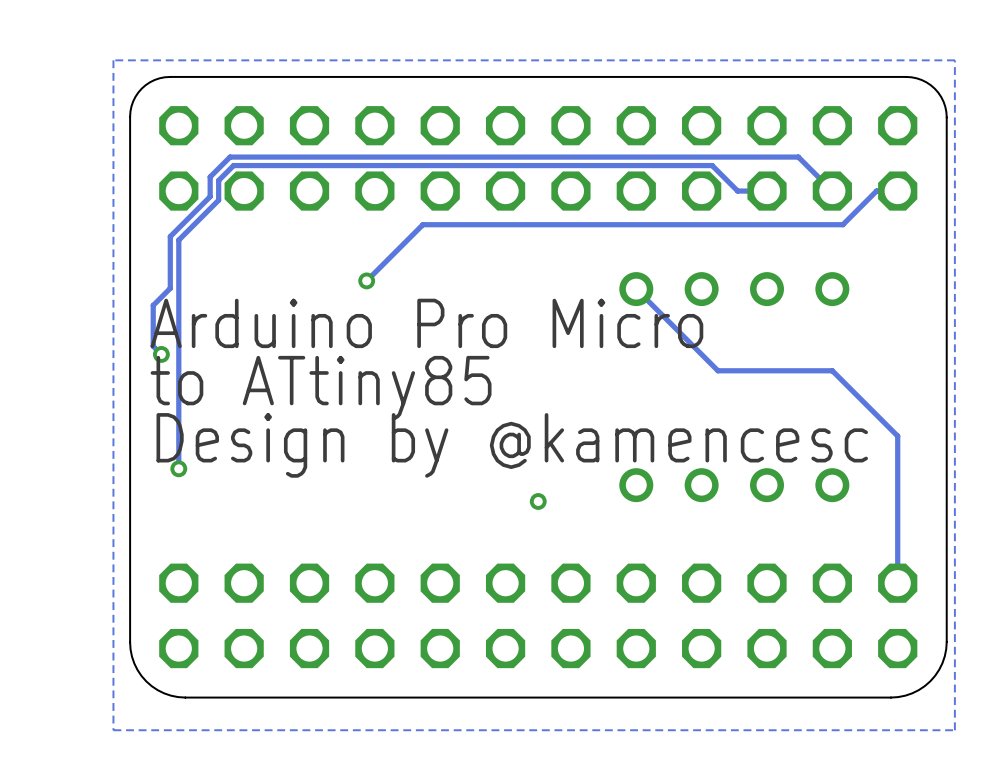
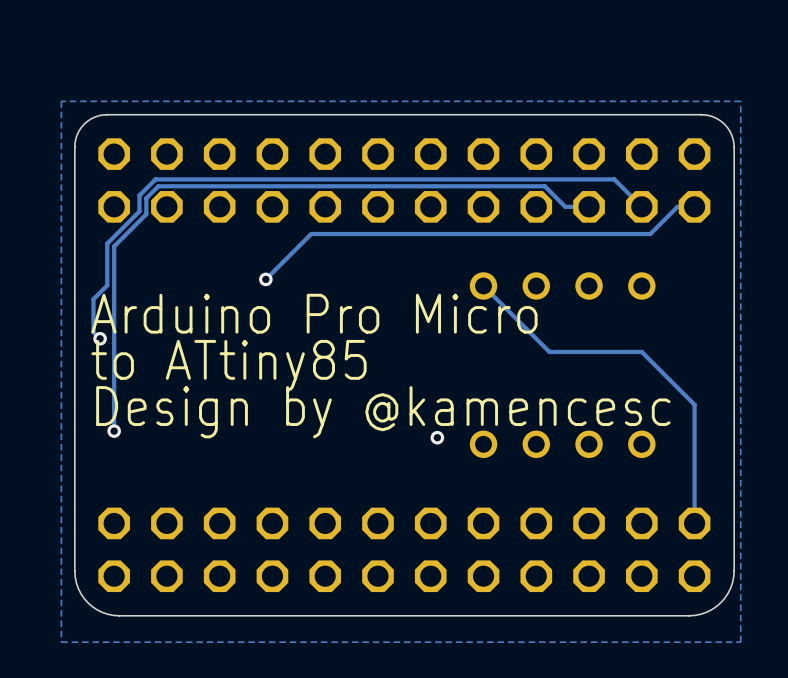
via position: (538, 501) -> (437, 437)

